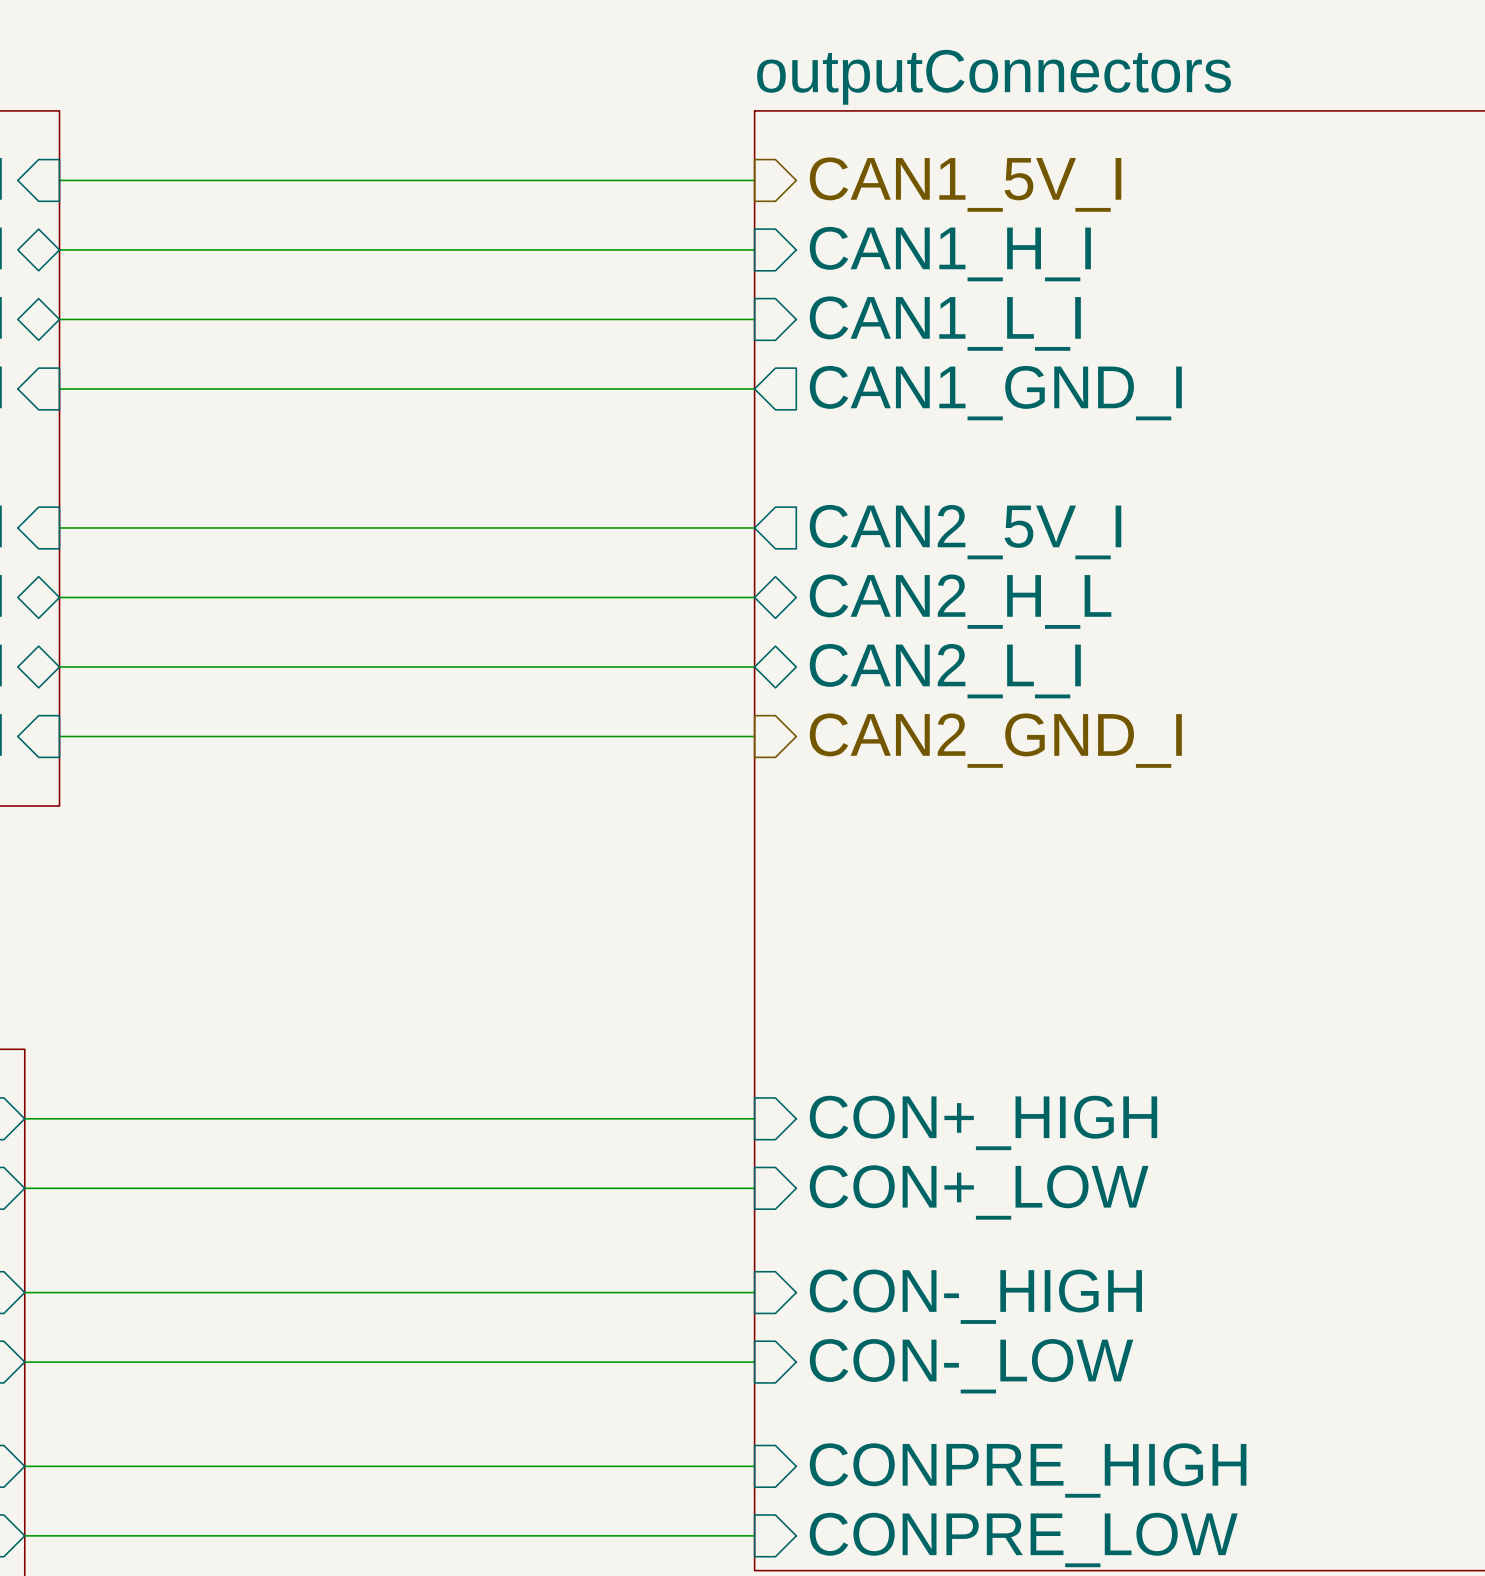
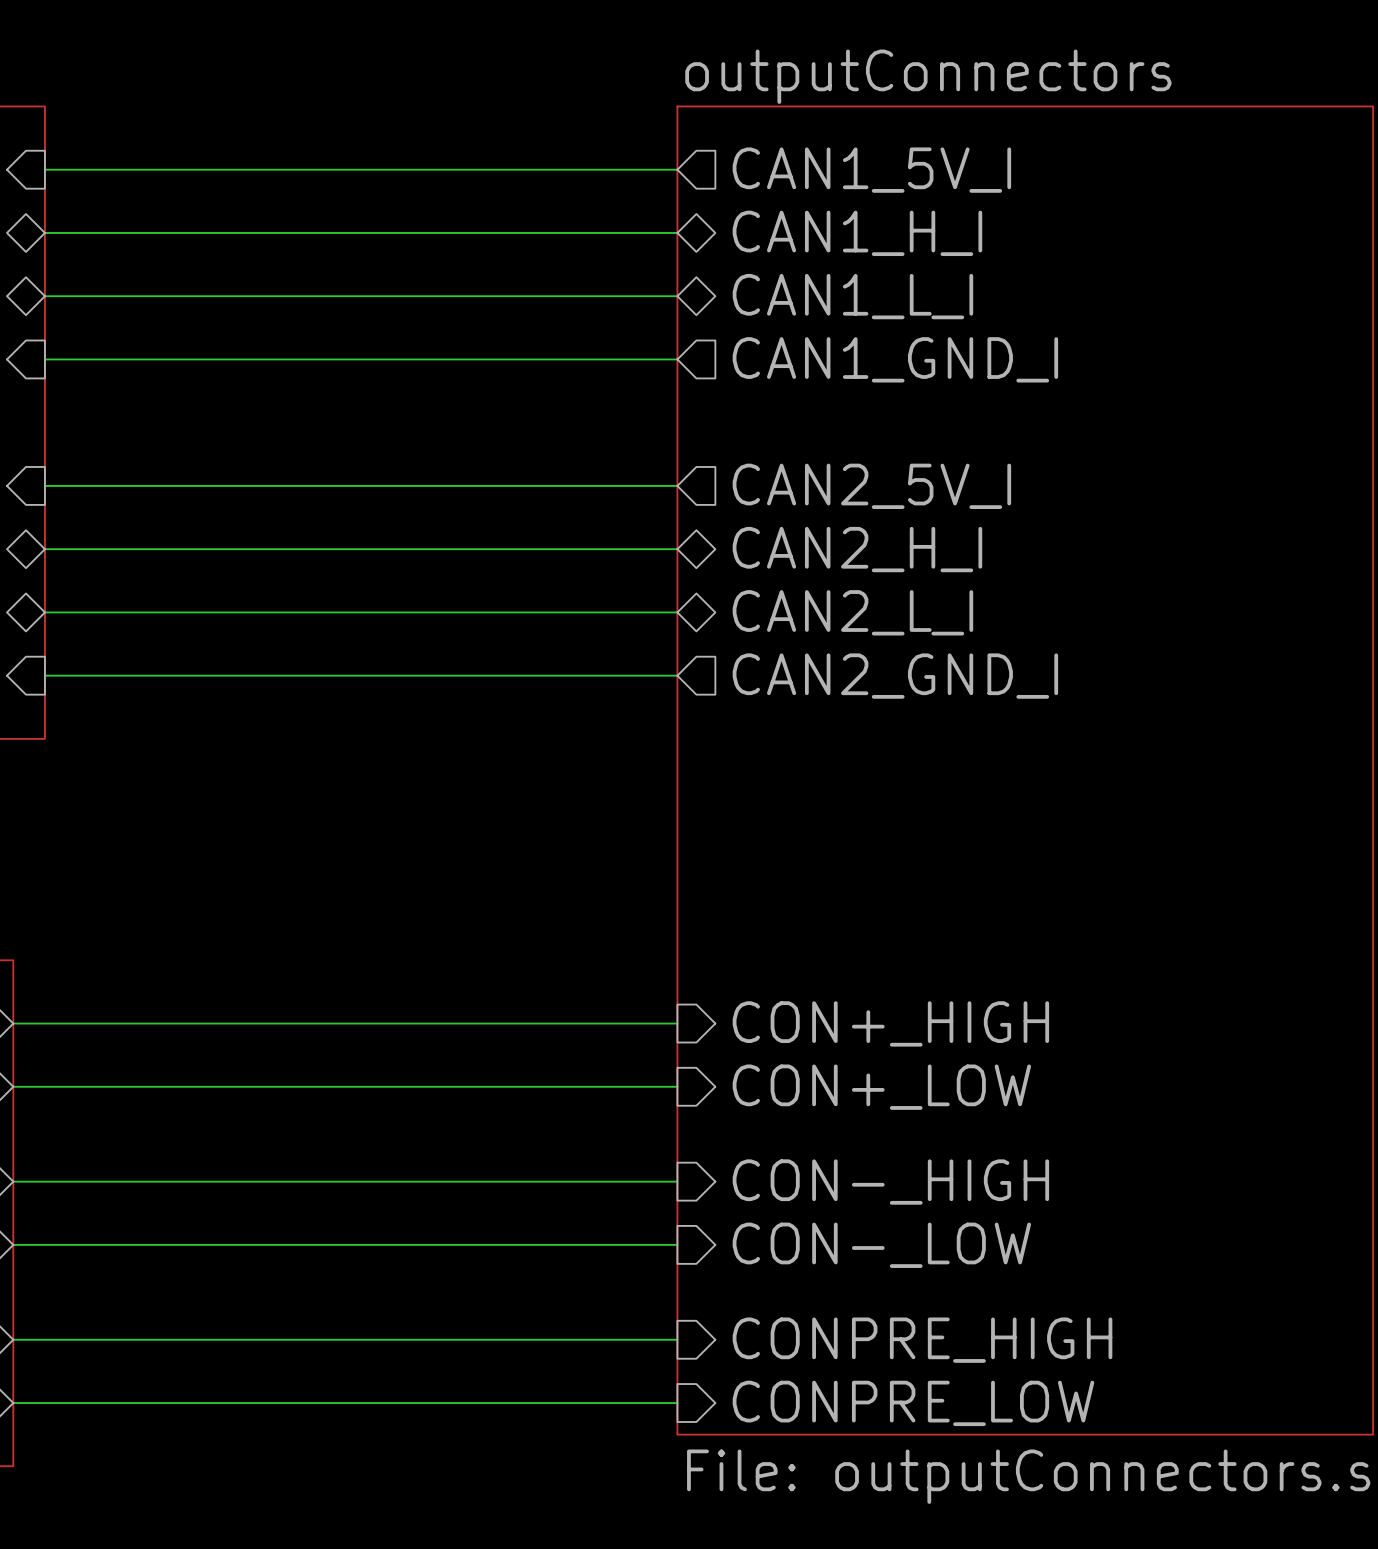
sheet pin: none -> CAN1_5V_I (871, 170)
hierarchical label: CAN1_5V_I (965, 184) -> none
sheet pin shape: input (950, 254) -> bidirectional (857, 233)
sheet pin shape: input (945, 323) -> bidirectional (852, 296)
sheet pin: CAN2_H_L (960, 601) -> CAN2_H_I (857, 549)
sheet pin: none -> CAN2_GND_I (895, 676)
hierarchical label: CAN2_GND_I (995, 740) -> none

